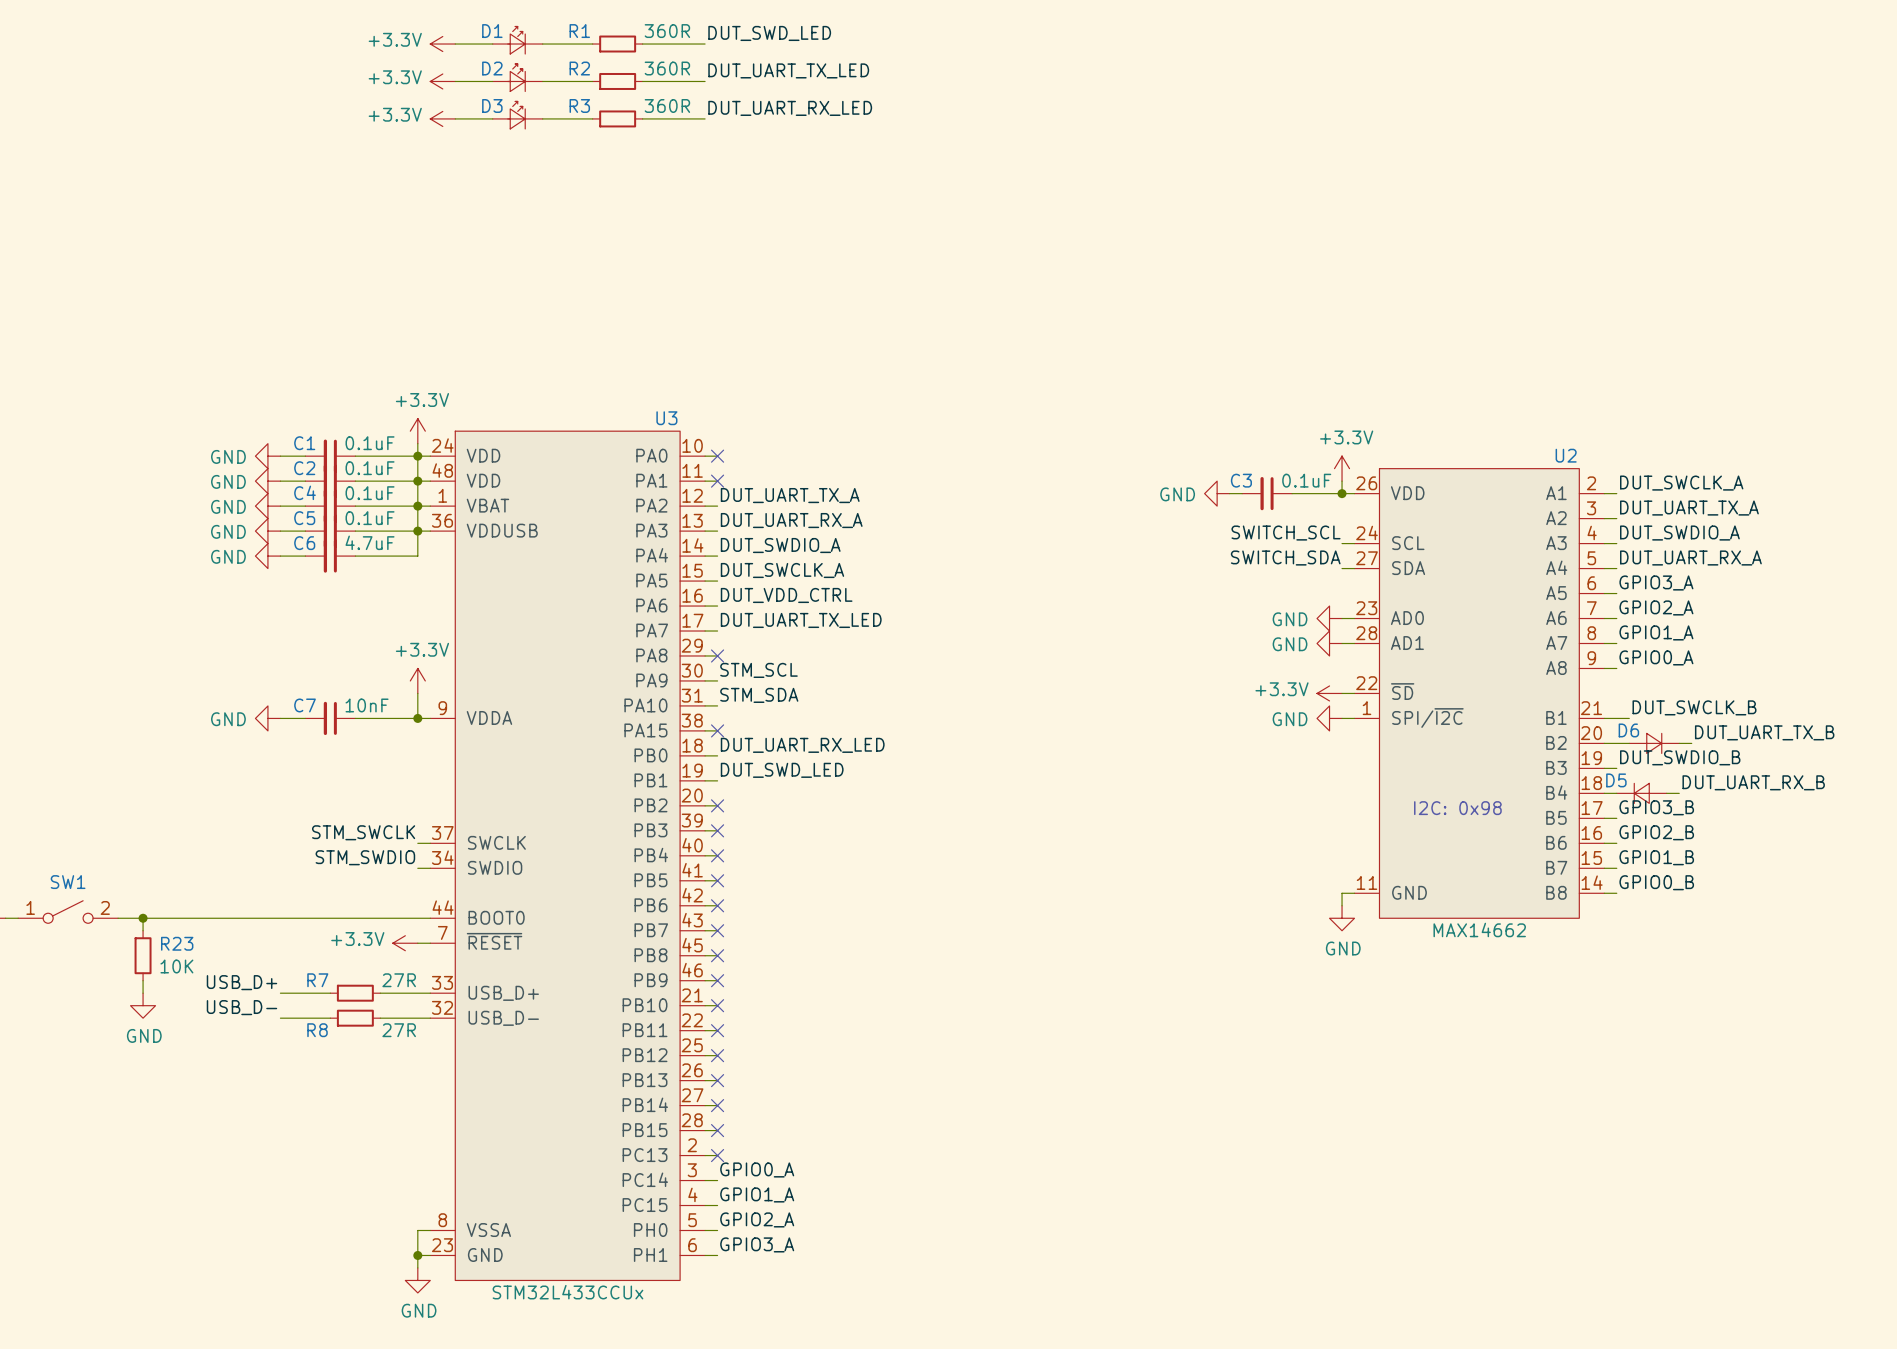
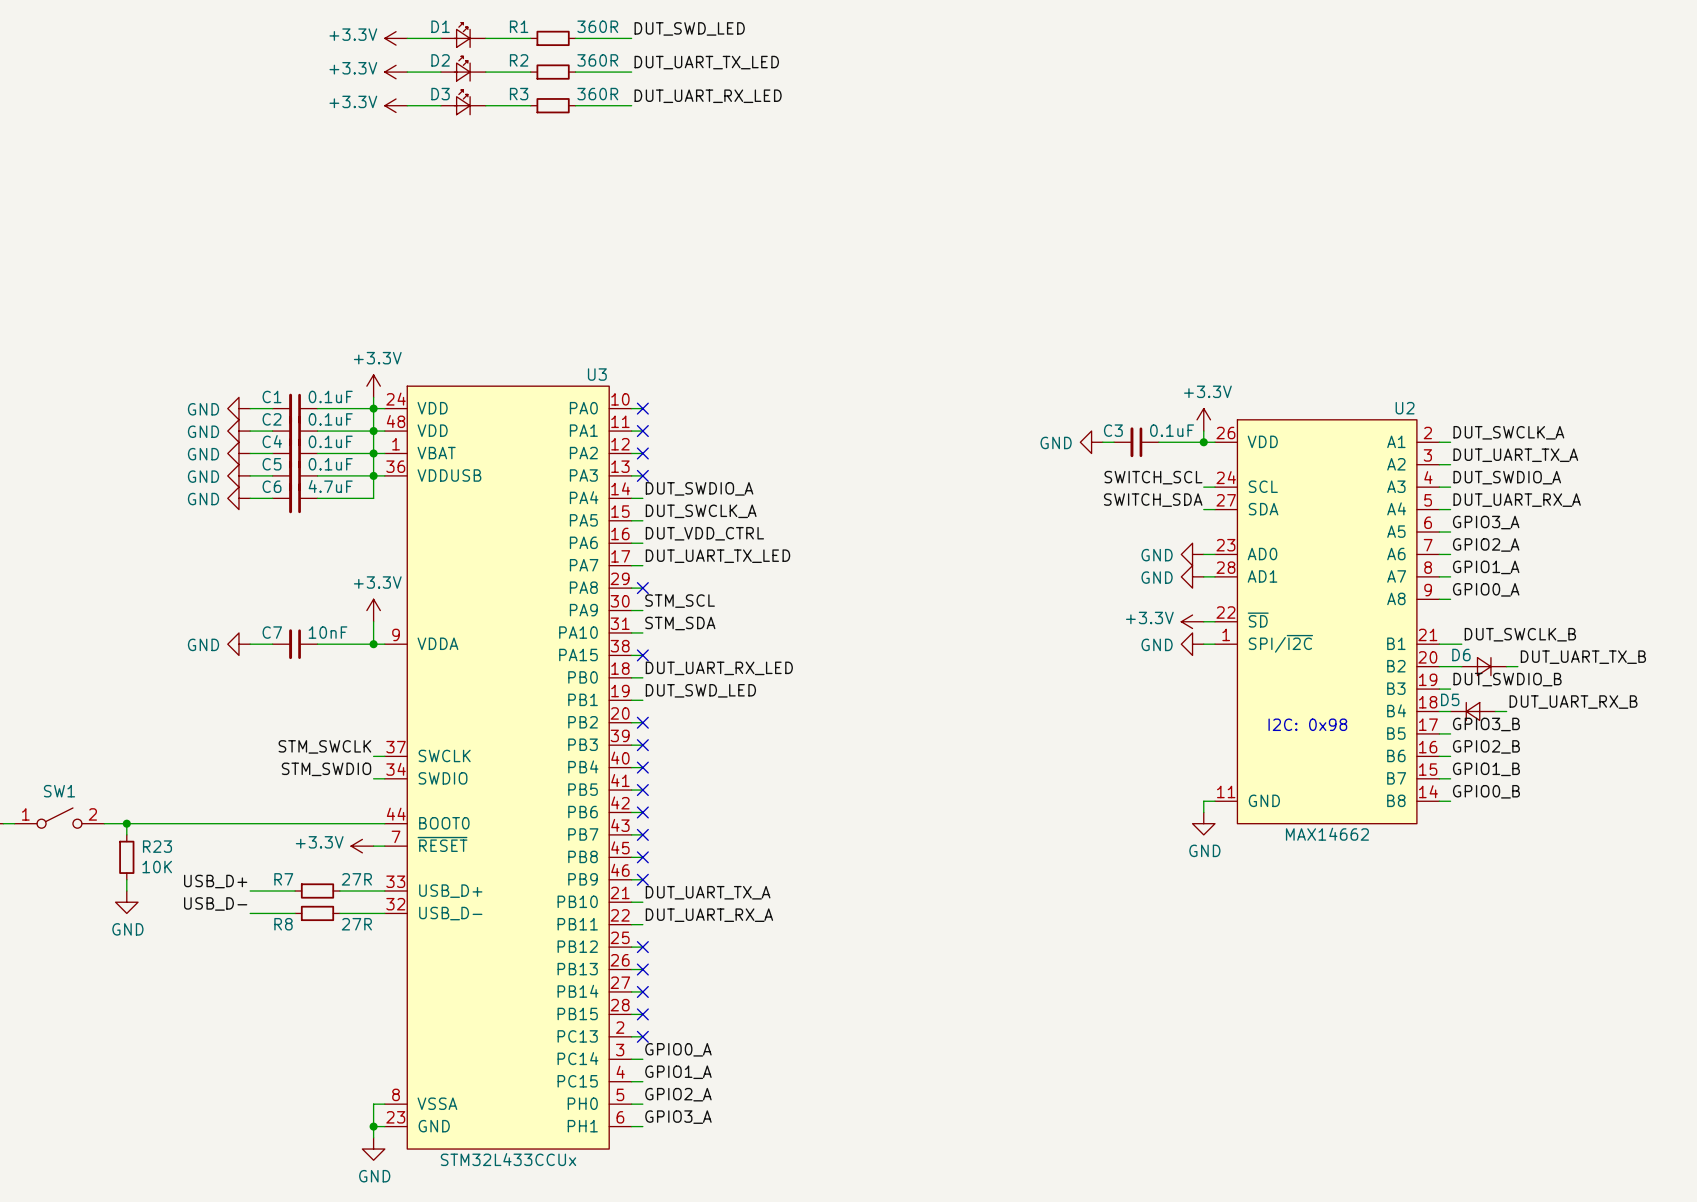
label: DUT_UART_TX_A (790, 495) -> none
no-connect mark: none -> (642, 453)
label: DUT_UART_RX_A (791, 520) -> none
no-connect mark: none -> (642, 475)
label: none -> DUT_UART_TX_A (708, 892)
no-connect mark: (717, 1005) -> none
label: none -> DUT_UART_RX_A (709, 915)
no-connect mark: (717, 1030) -> none

